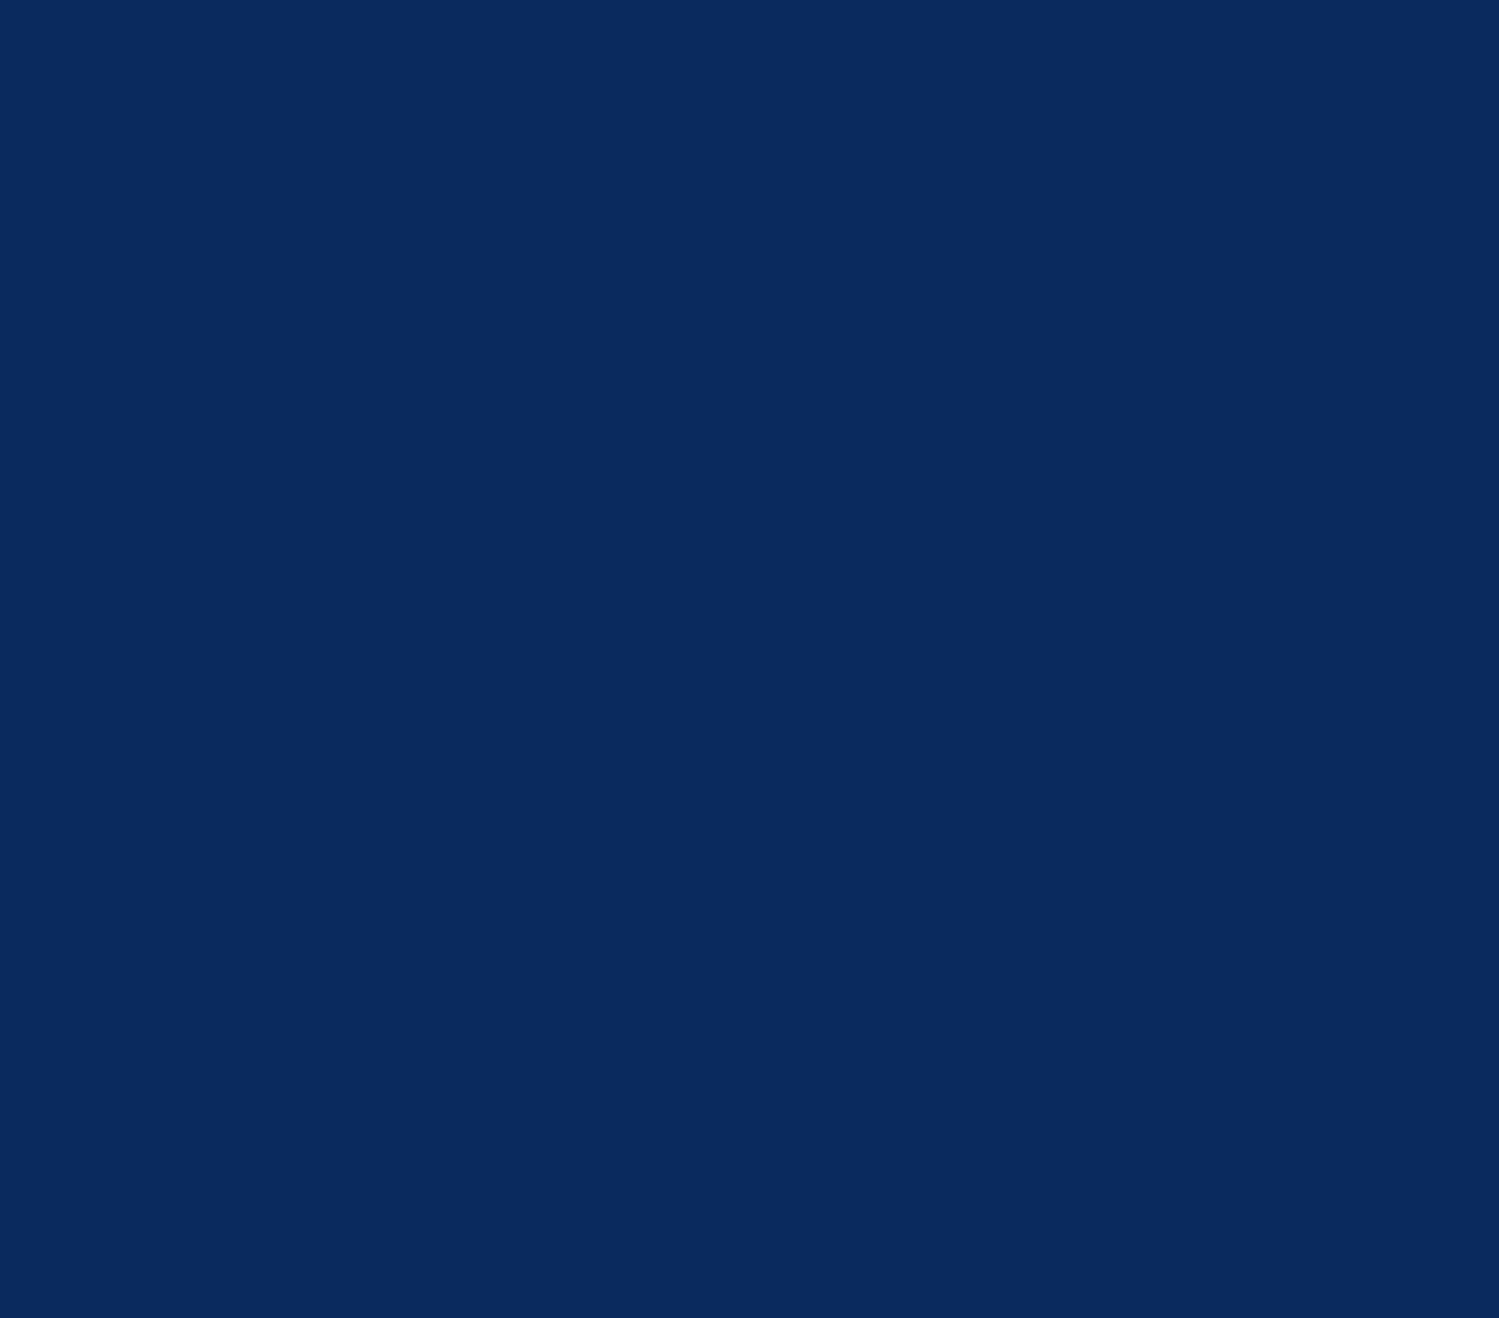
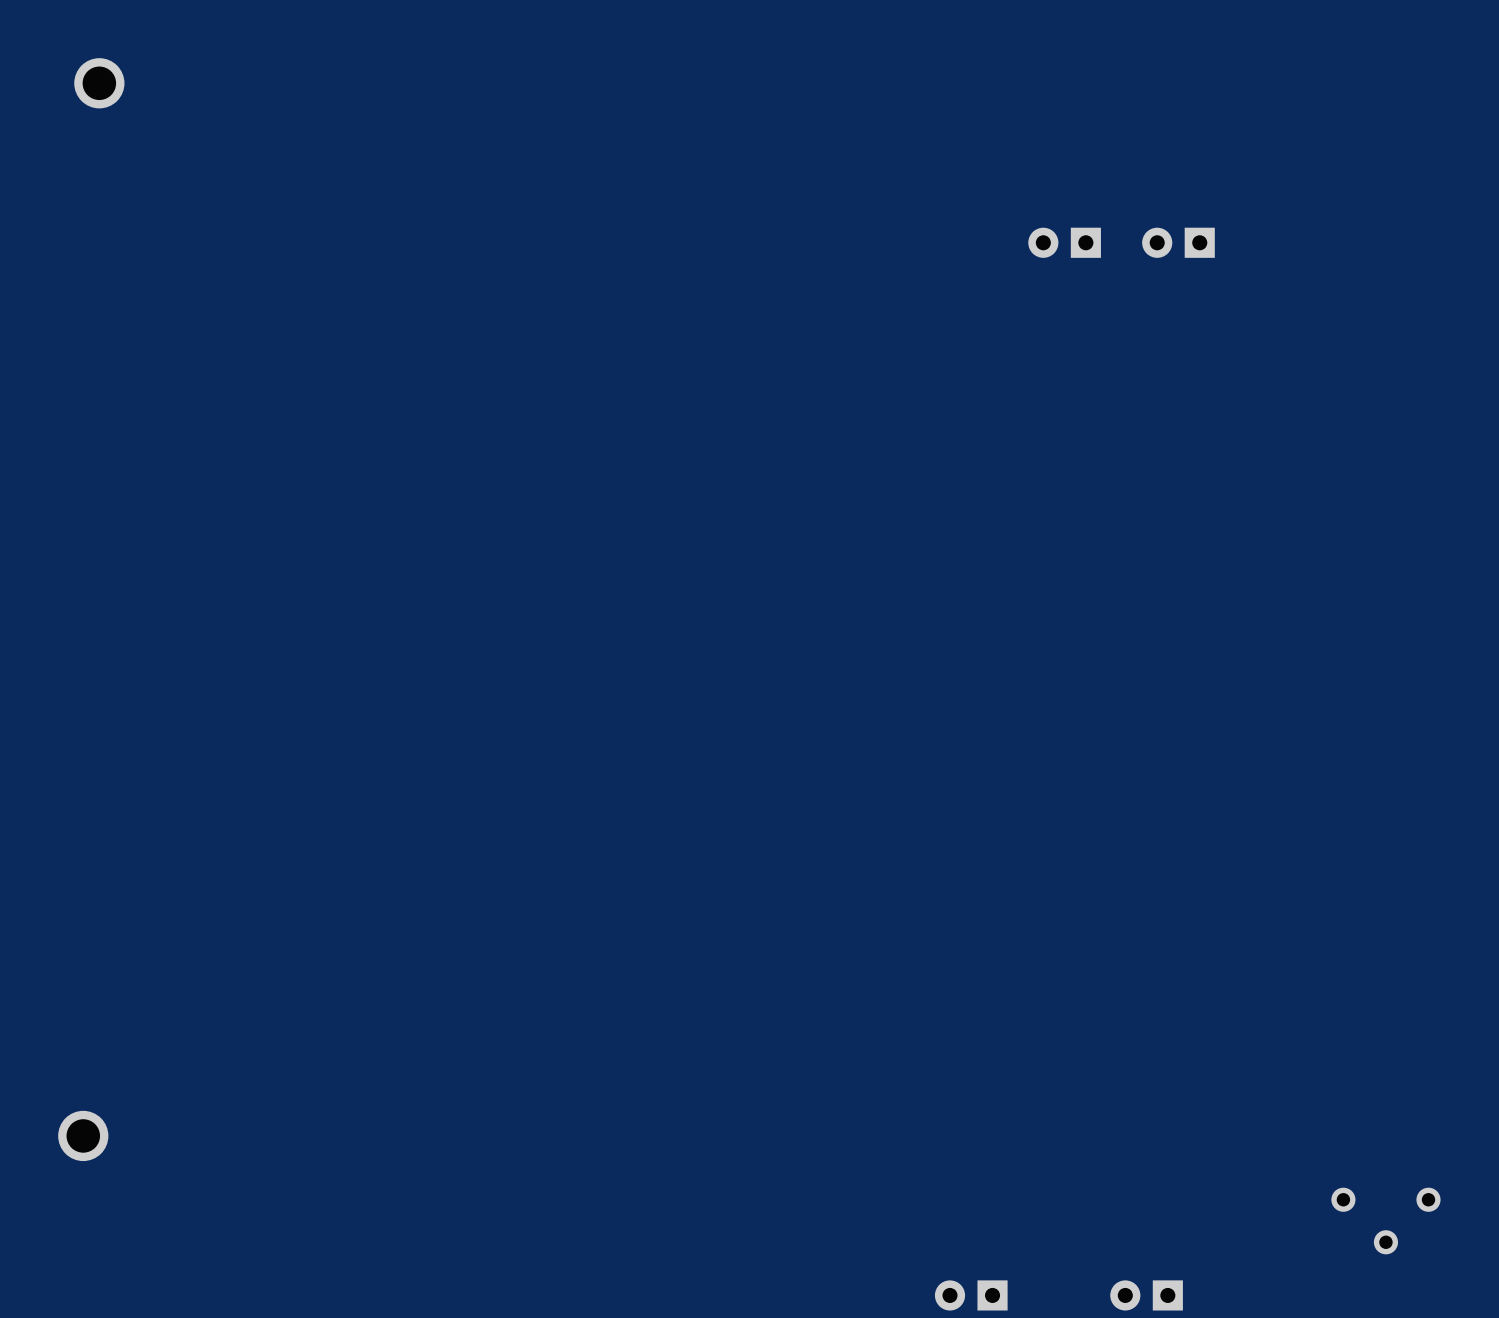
part: none -> (99, 83)
part: none -> (1064, 242)
part: none -> (1178, 242)
part: none -> (83, 1135)
part: none -> (1385, 1221)
part: none -> (971, 1295)
part: none -> (1146, 1295)

